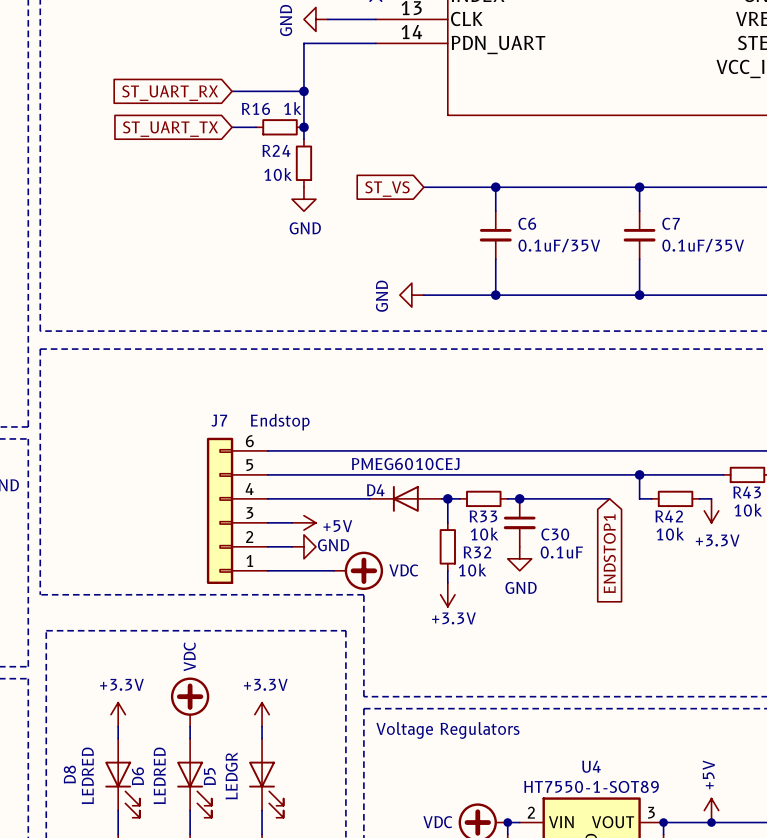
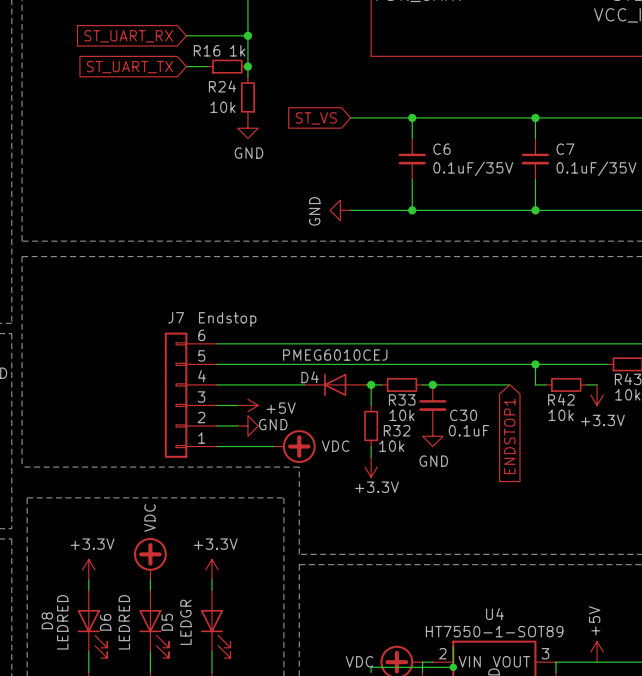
text: Voltage Regulators (447, 730) -> none
wire: none -> (453, 646) (453, 667) (371, 667) (371, 672)
junction position: (507, 822) -> (453, 667)
junction: (663, 822) -> none
junction: (711, 822) -> none

